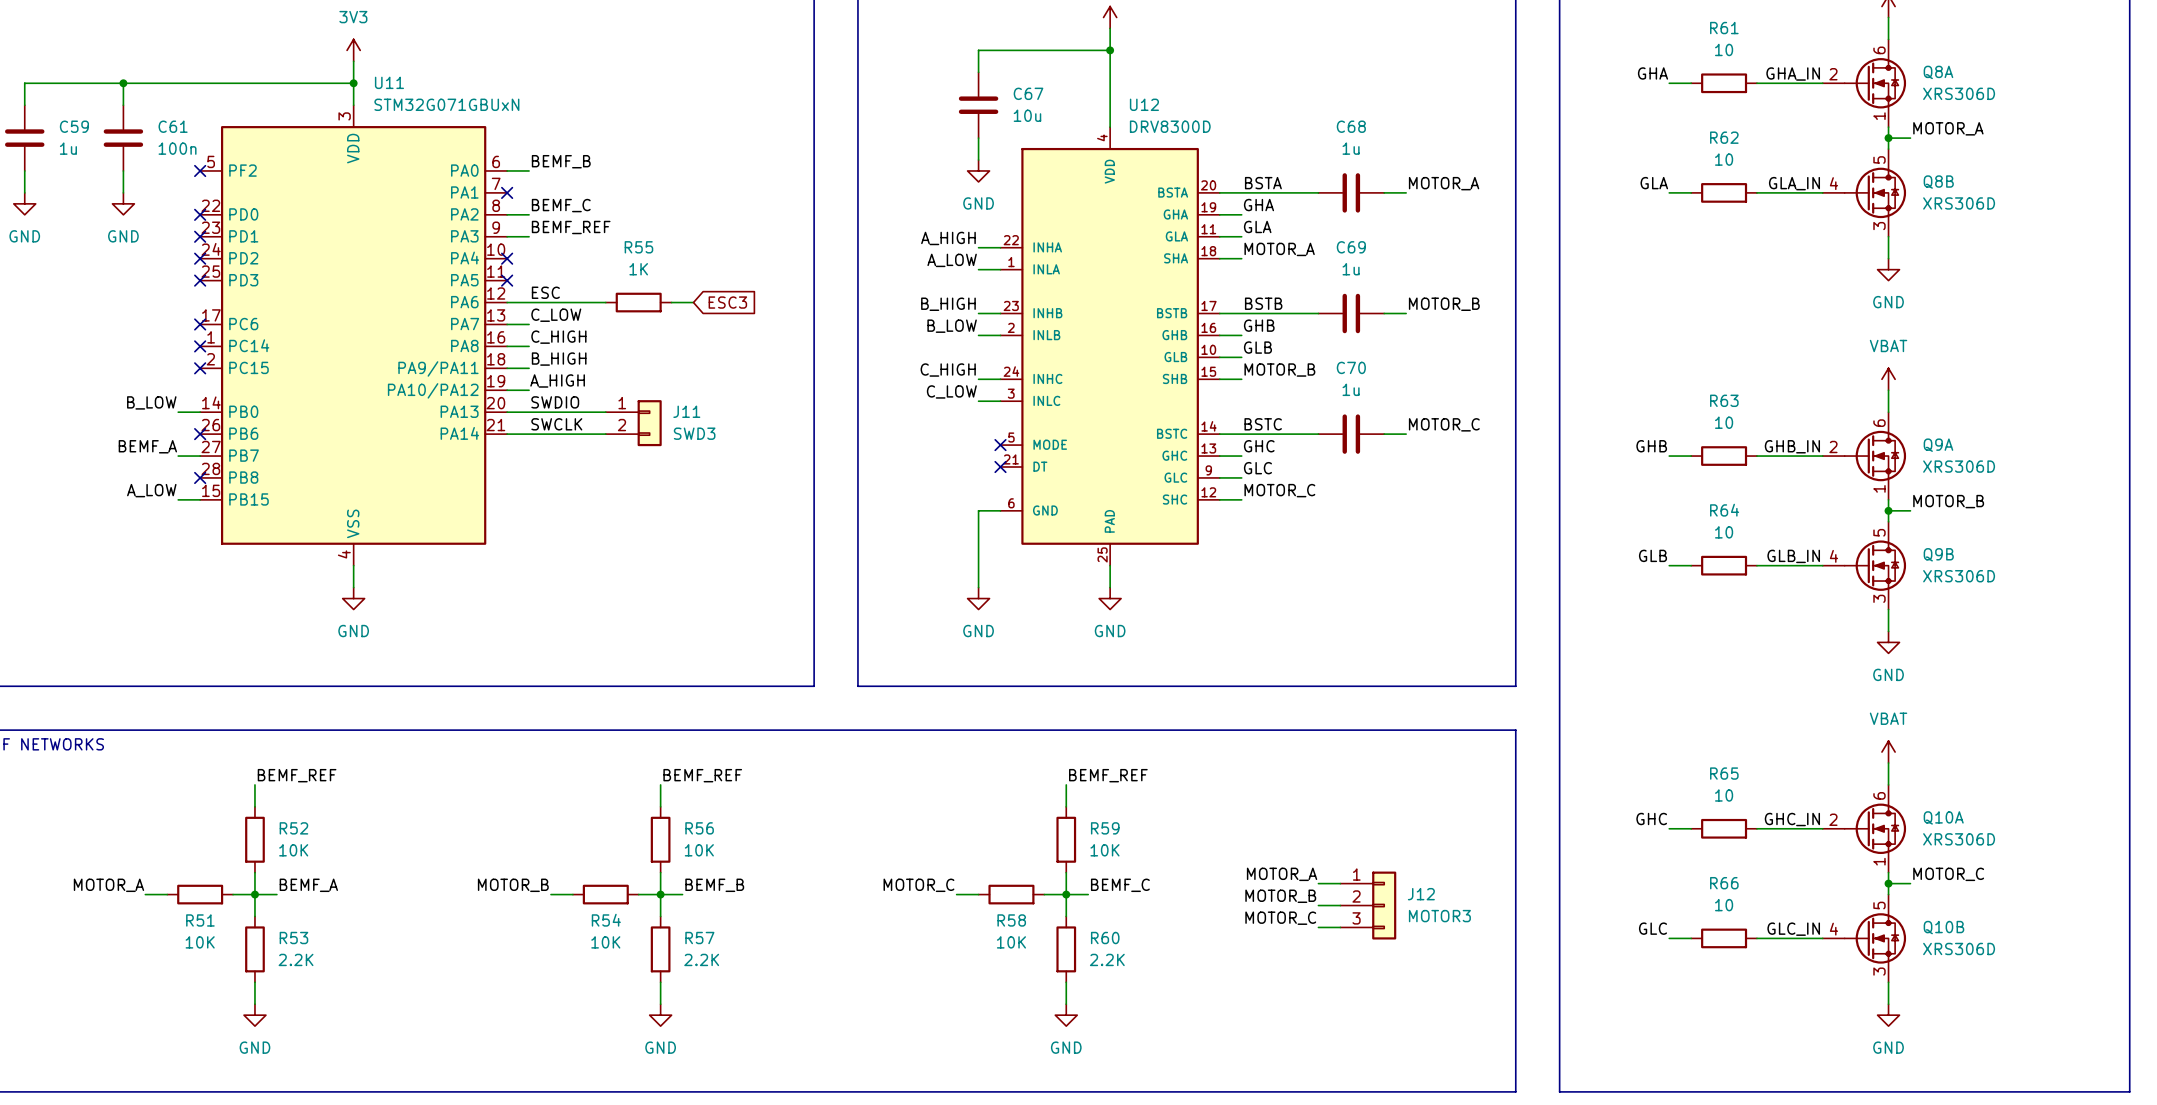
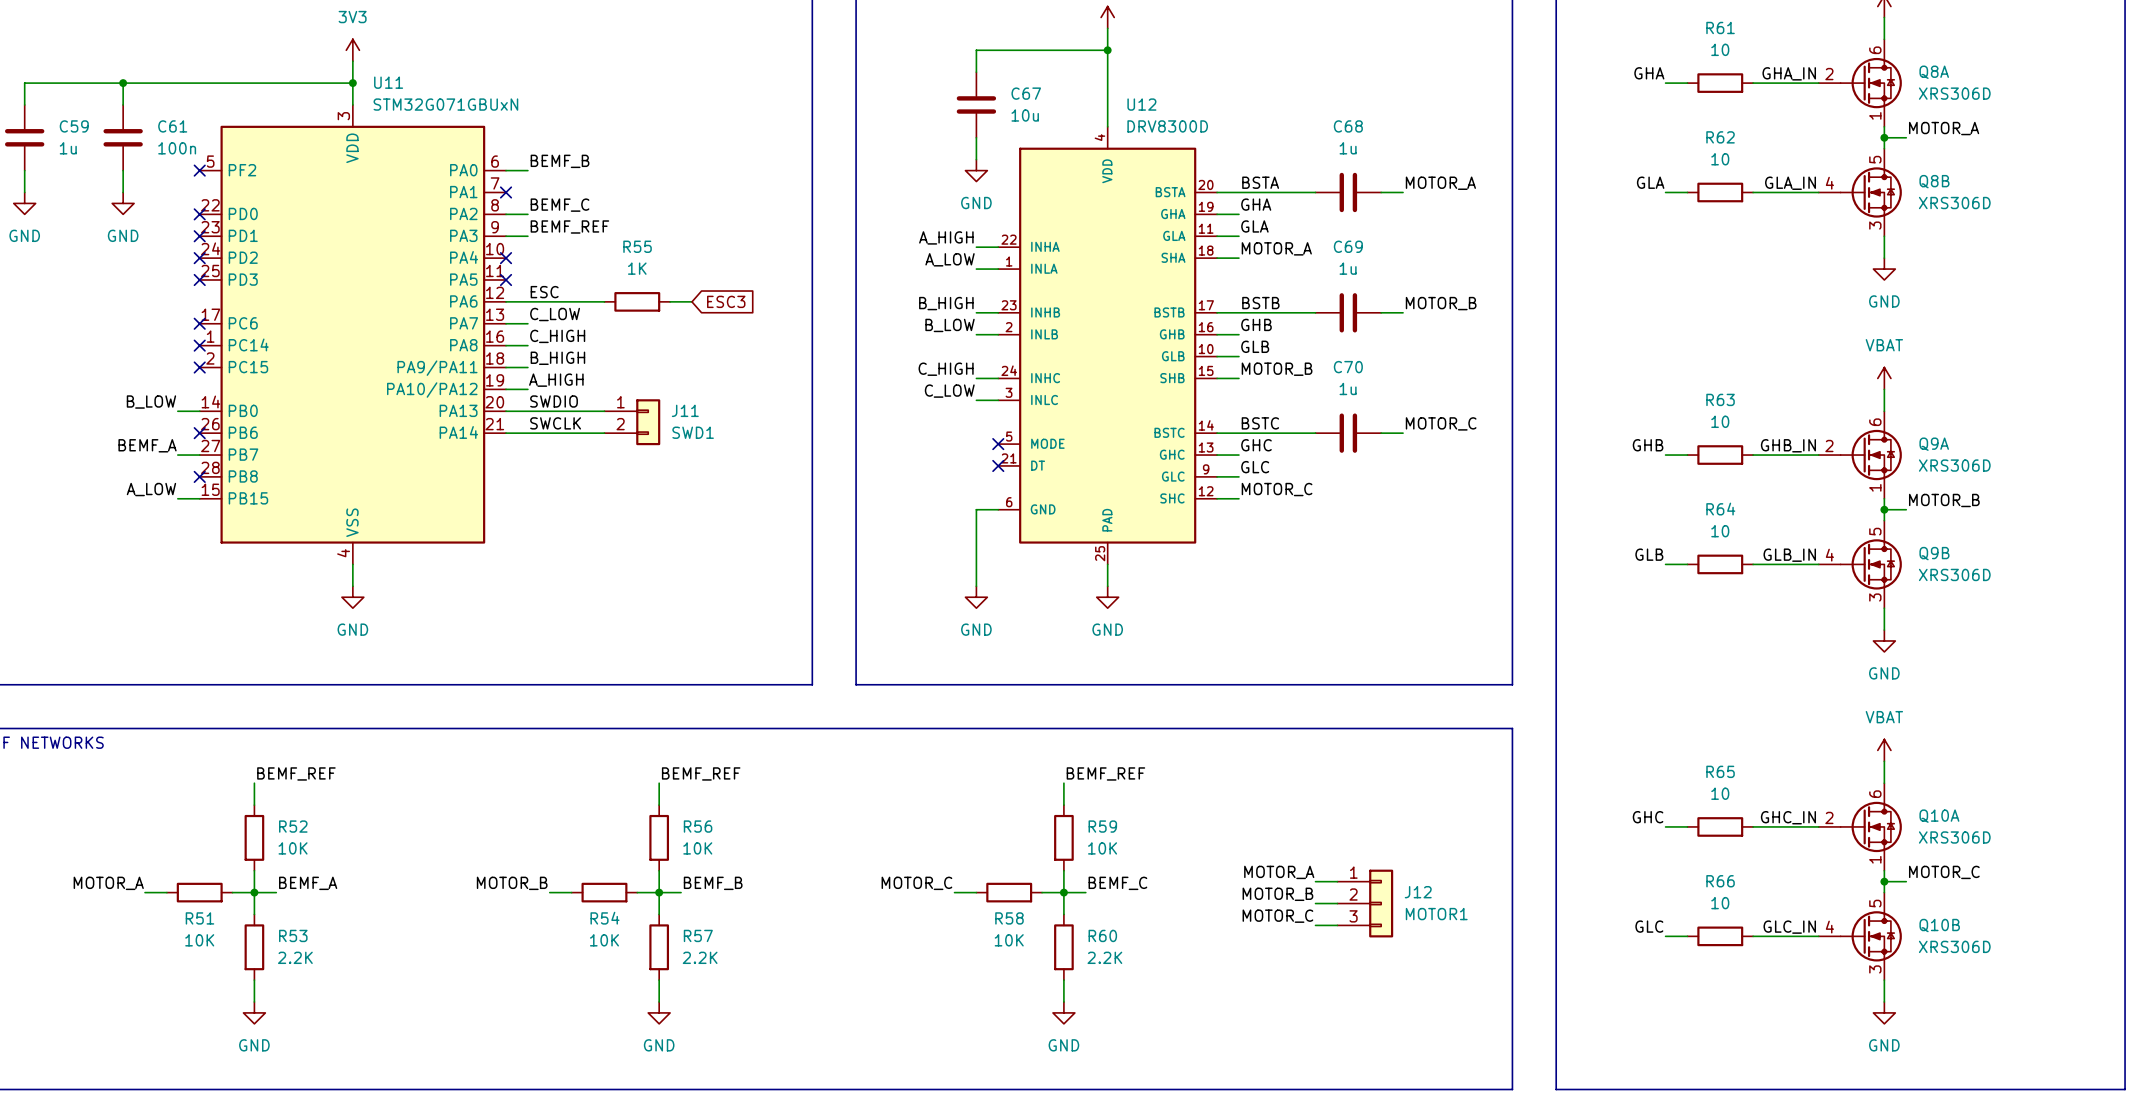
J11 value: SWD3 (694, 433) -> SWD1 (693, 432)
J12 value: MOTOR3 (1439, 916) -> MOTOR1 (1436, 914)

